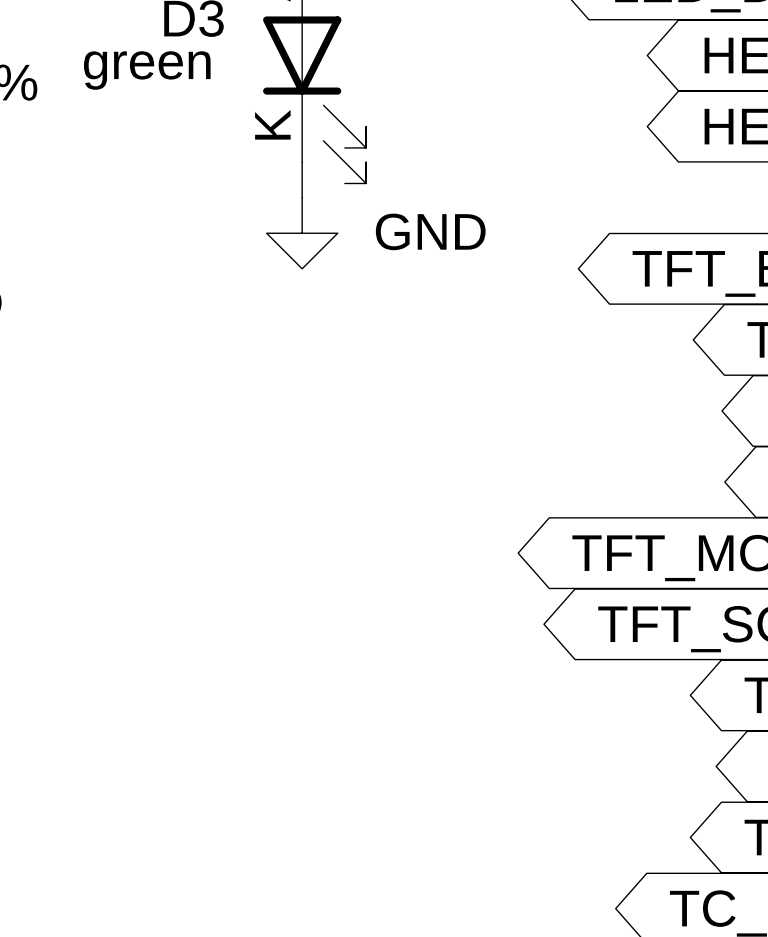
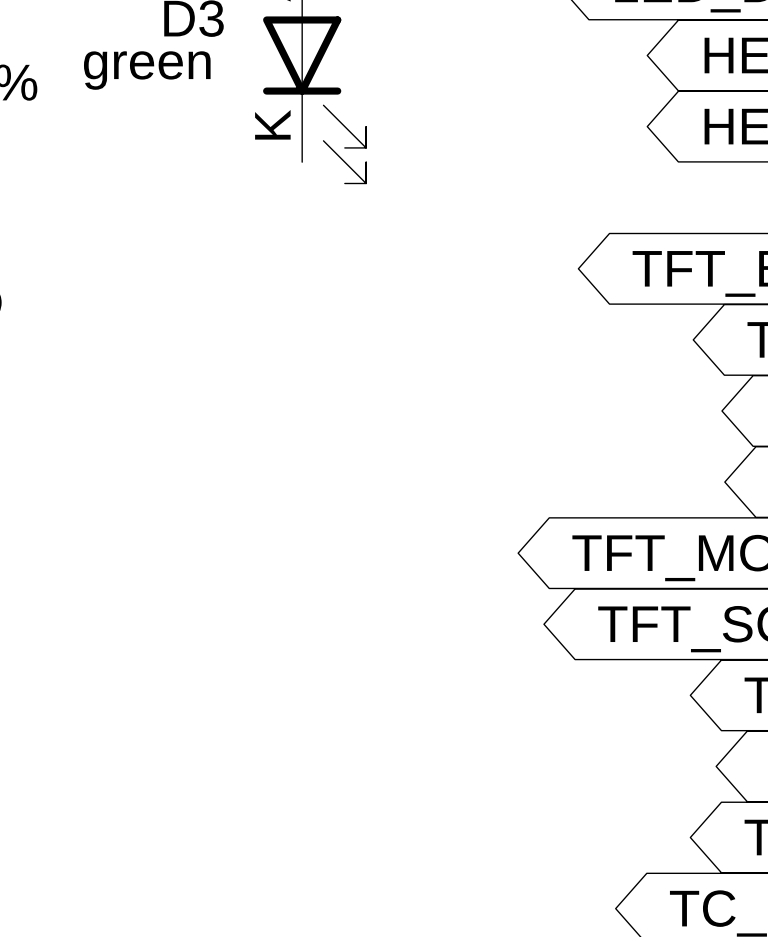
wire: (302, 162) (302, 197) -> none
power symbol: GND (302, 233) -> none

